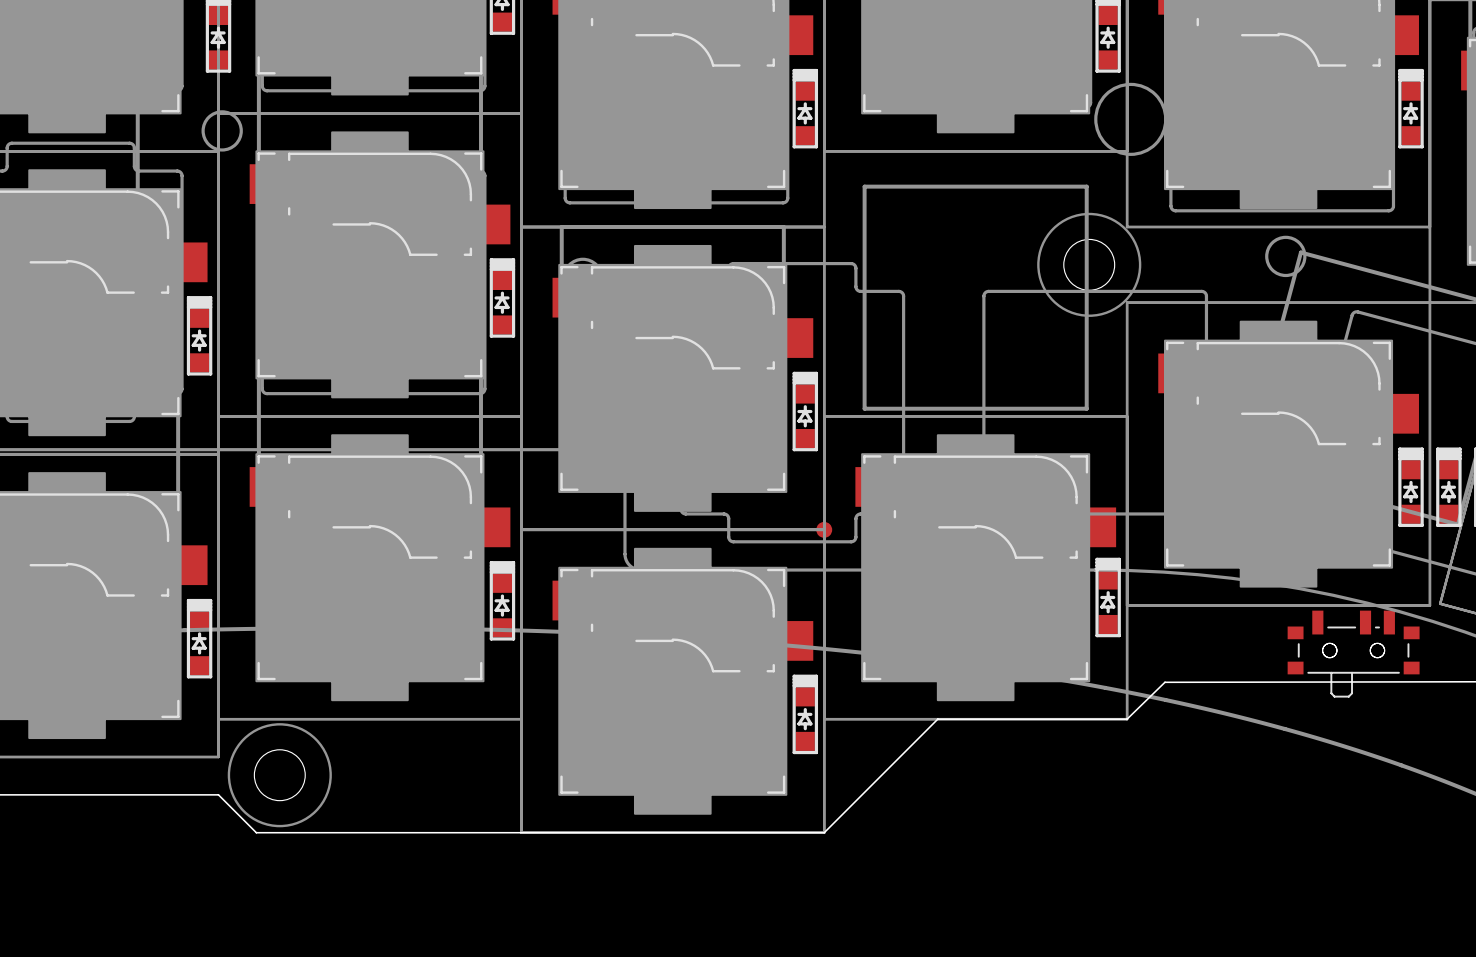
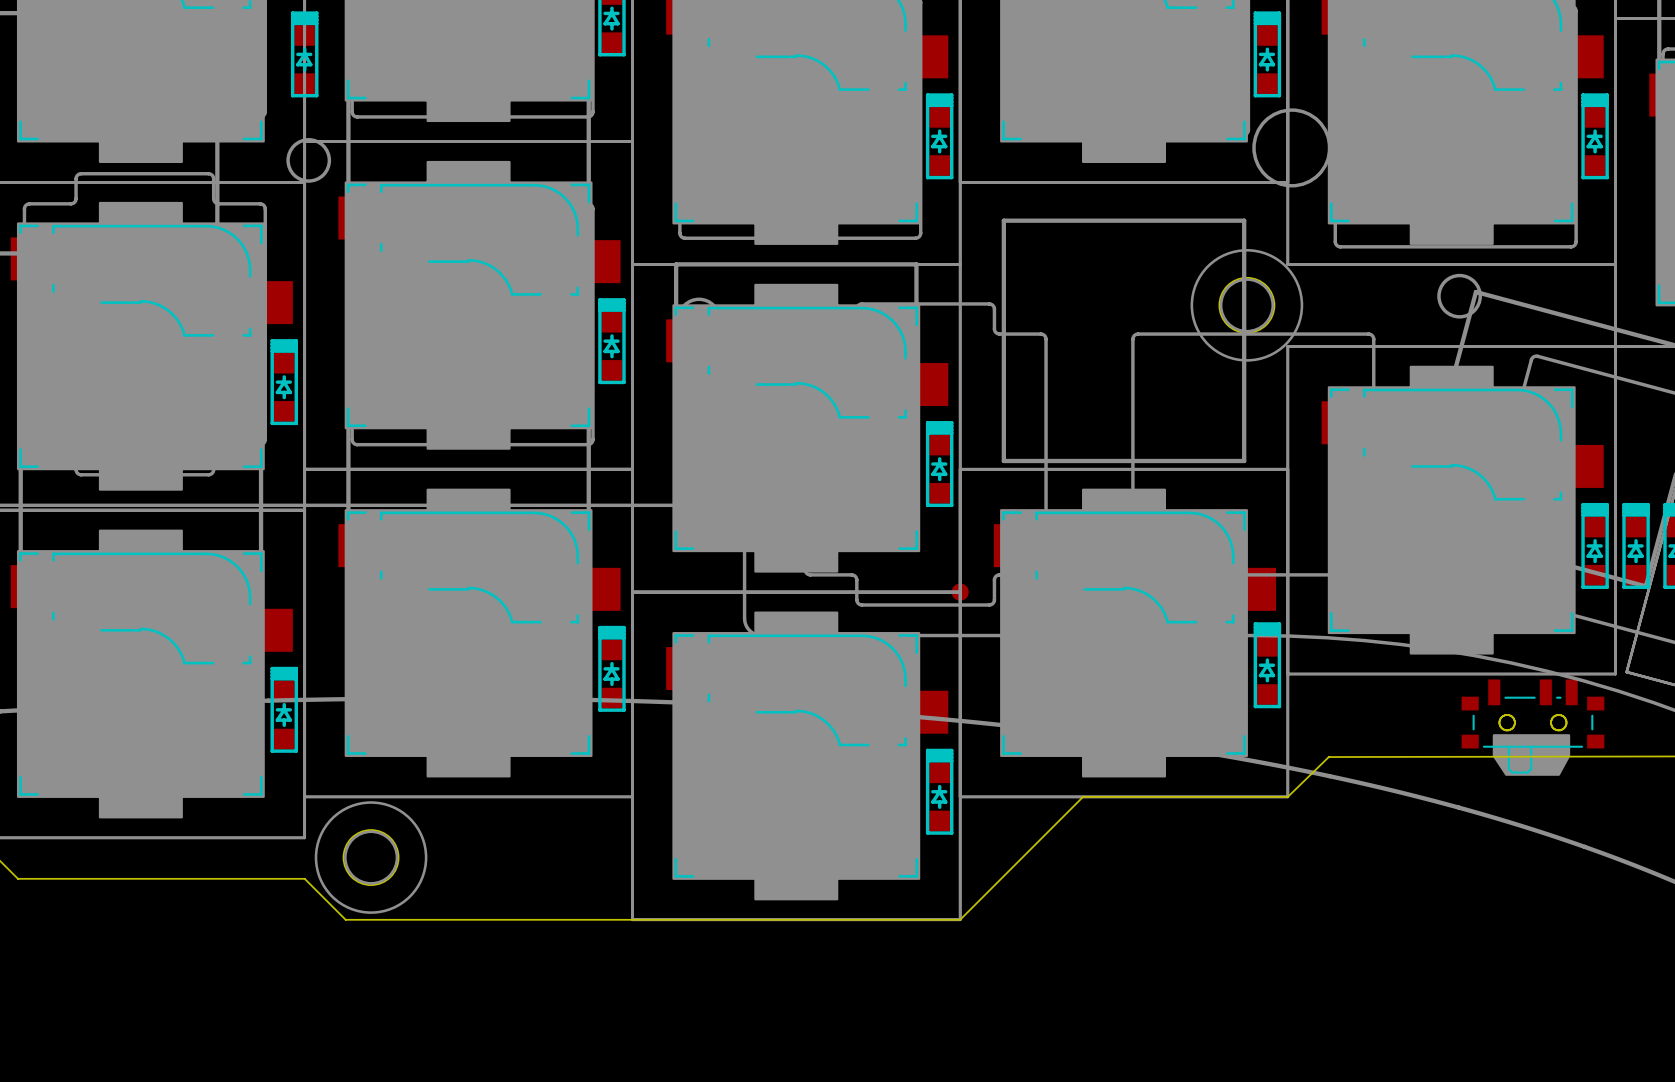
drawing: none -> [1219, 278, 1275, 333]
drawing: none -> [1492, 734, 1571, 776]
drawing: none -> [344, 830, 399, 885]

